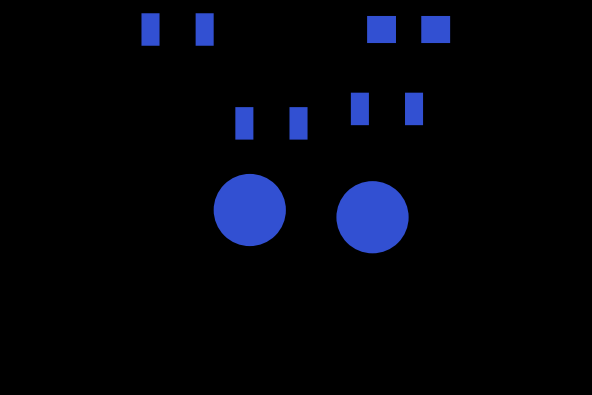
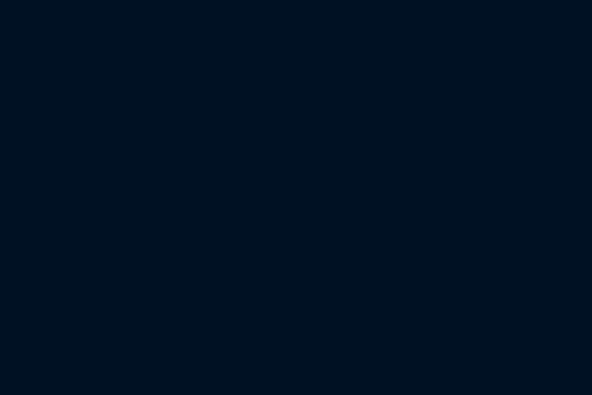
part: (177, 29) -> none
part: (408, 29) -> none
part: (386, 108) -> none
part: (271, 123) -> none
part: (249, 210) -> none
part: (372, 217) -> none

